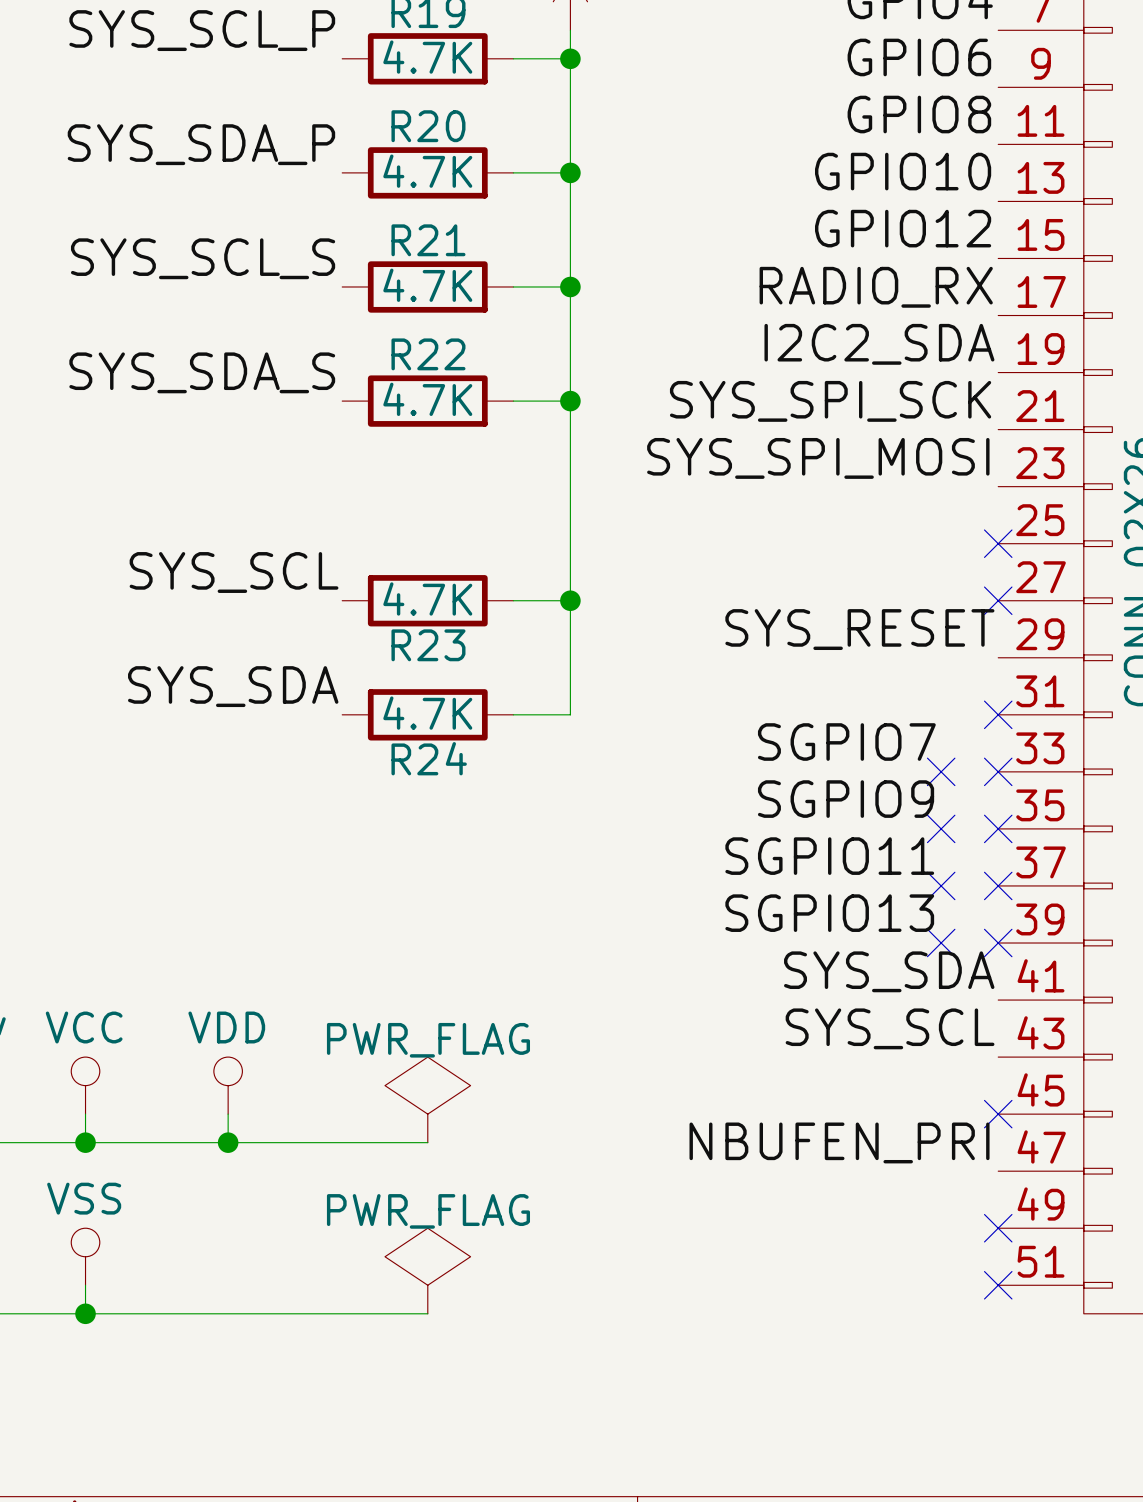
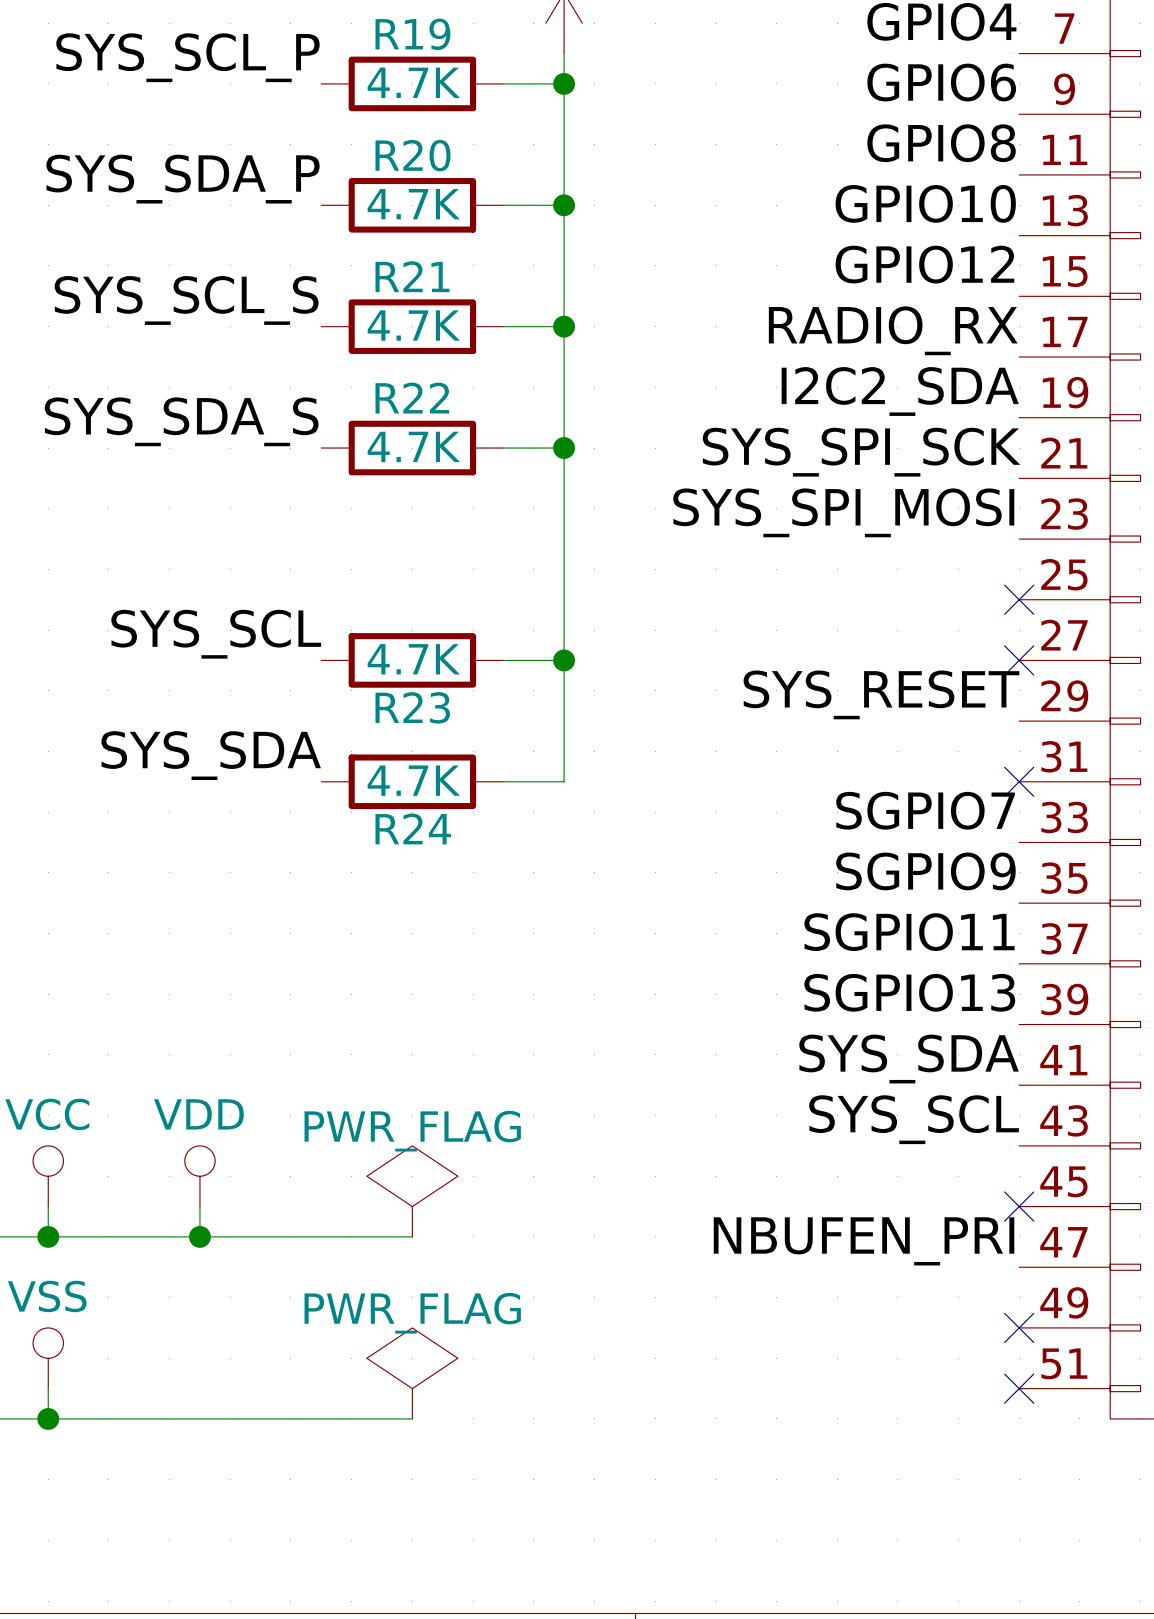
label position: SGPIO7 (846, 742) -> SGPIO7 (925, 810)
no-connect mark: (941, 771) -> none
no-connect mark: (998, 771) -> none
label position: SGPIO9 (846, 799) -> SGPIO9 (925, 871)
no-connect mark: (941, 828) -> none
no-connect mark: (998, 828) -> none
label position: SGPIO11 (829, 856) -> SGPIO11 (909, 932)
no-connect mark: (941, 885) -> none
no-connect mark: (998, 885) -> none
label position: SGPIO13 (829, 913) -> SGPIO13 (909, 992)
no-connect mark: (941, 943) -> none
no-connect mark: (998, 943) -> none

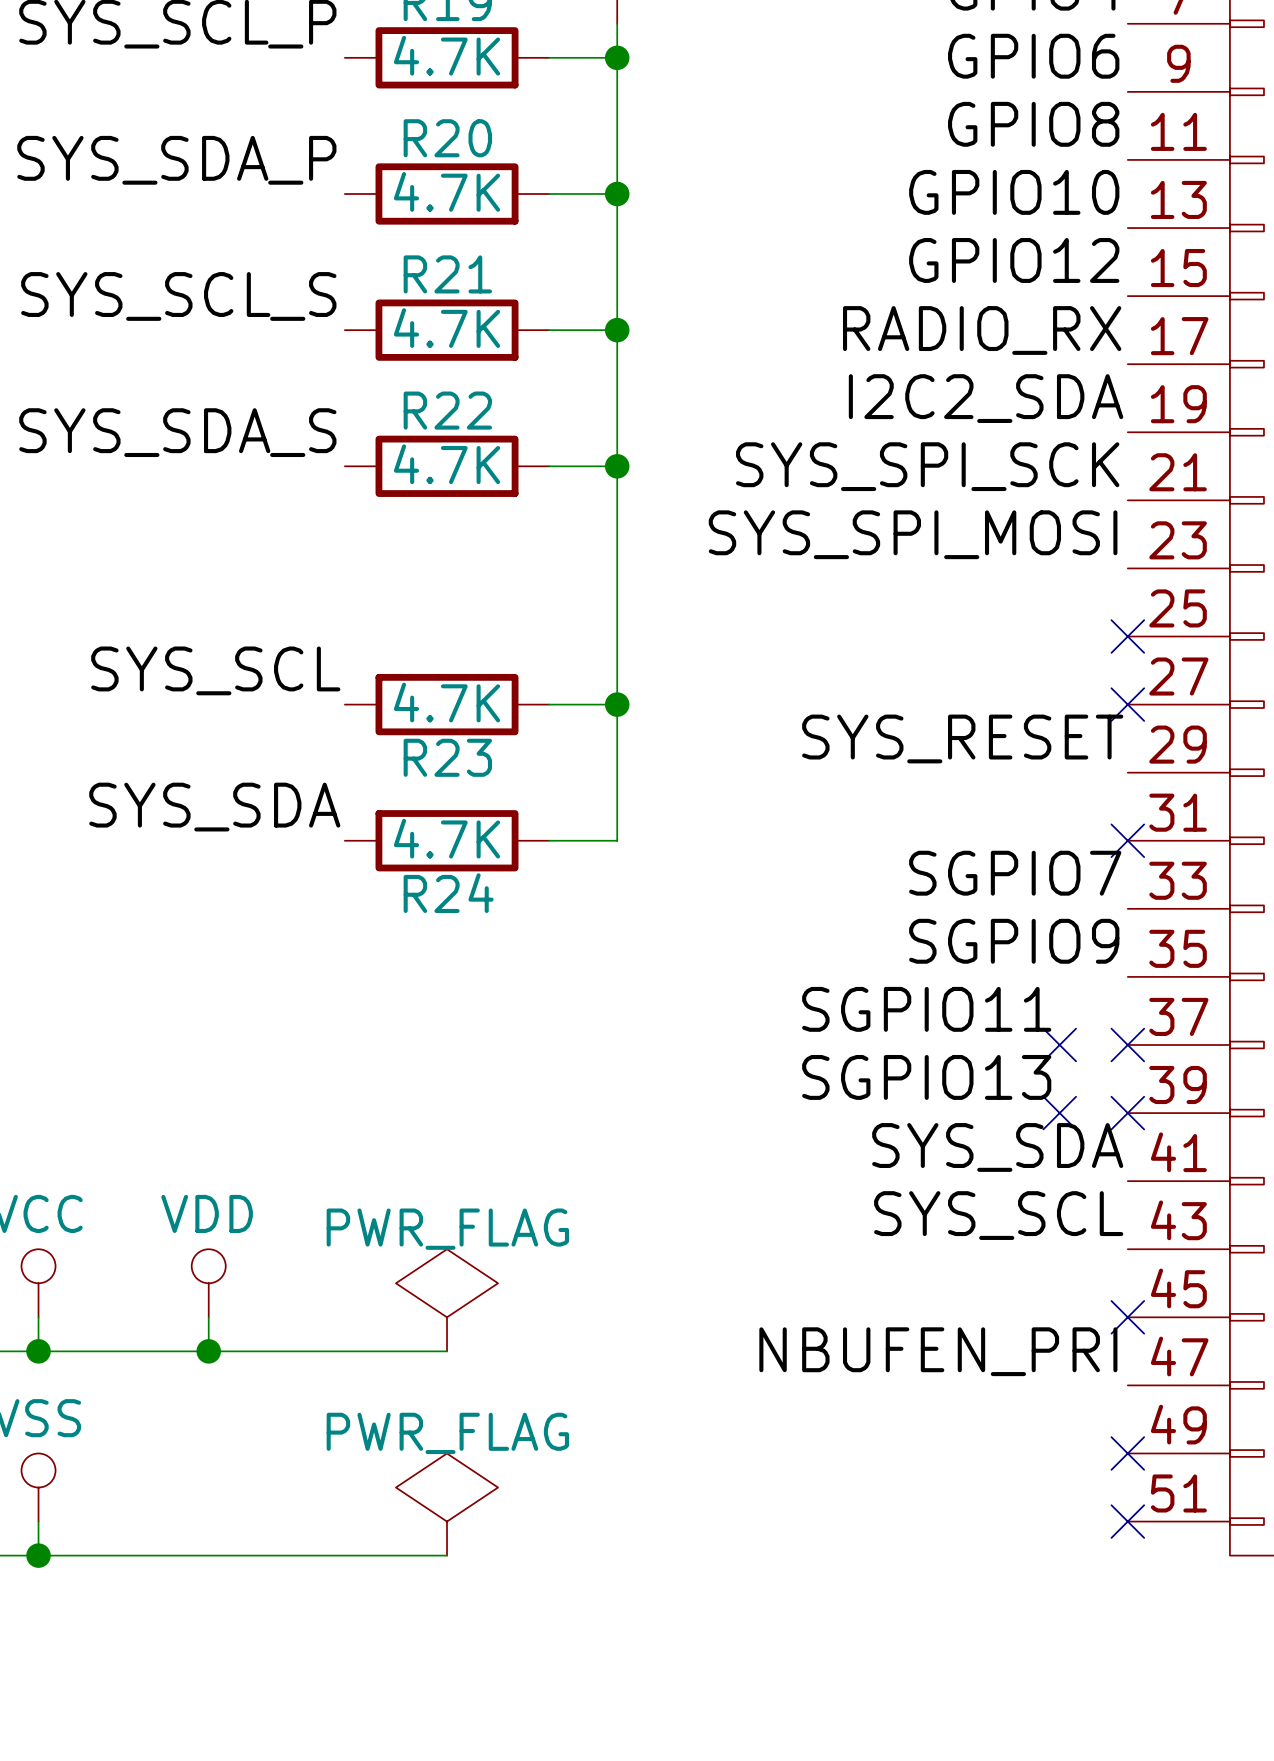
label position: SGPIO11 (909, 932) -> SGPIO11 (926, 1009)
no-connect mark: none -> (1059, 1045)
no-connect mark: none -> (1127, 1045)
label position: SGPIO13 (909, 992) -> SGPIO13 (926, 1077)
no-connect mark: none -> (1059, 1113)
no-connect mark: none -> (1127, 1113)

